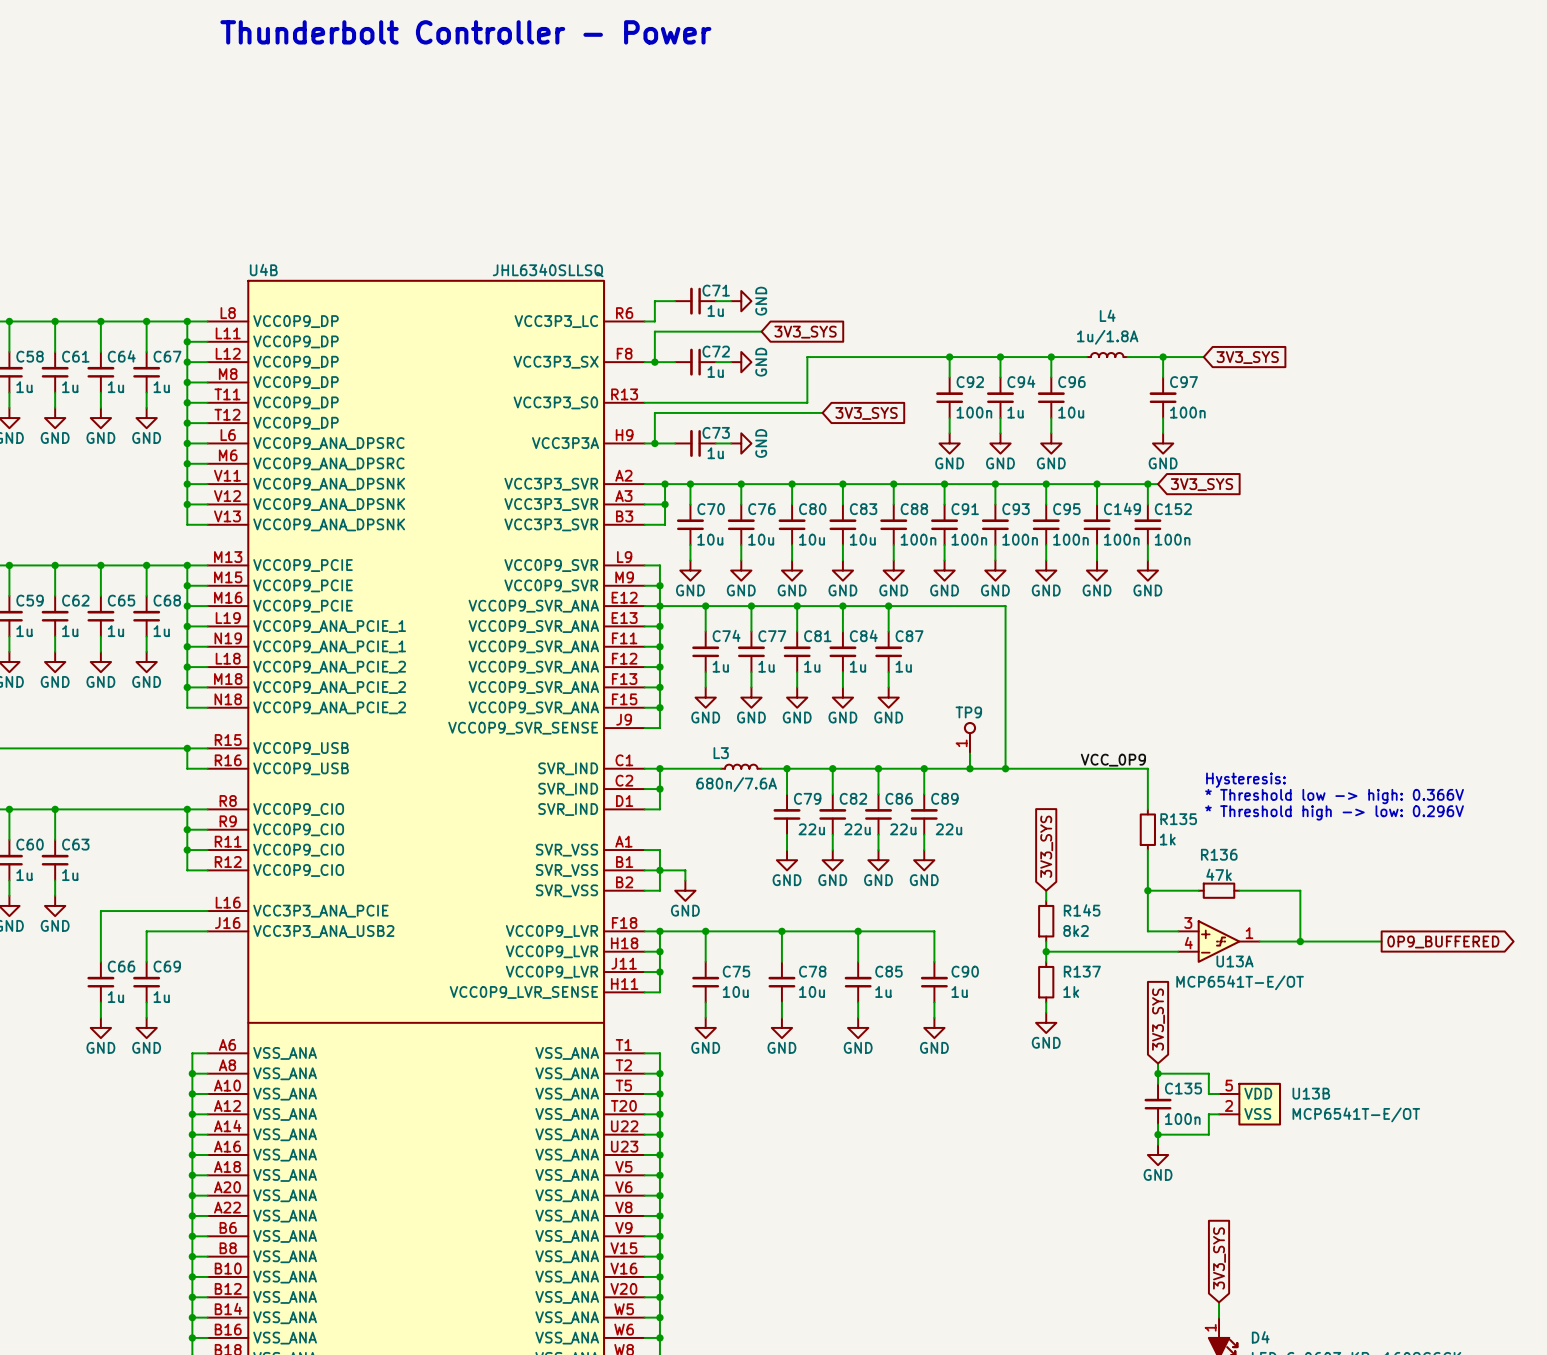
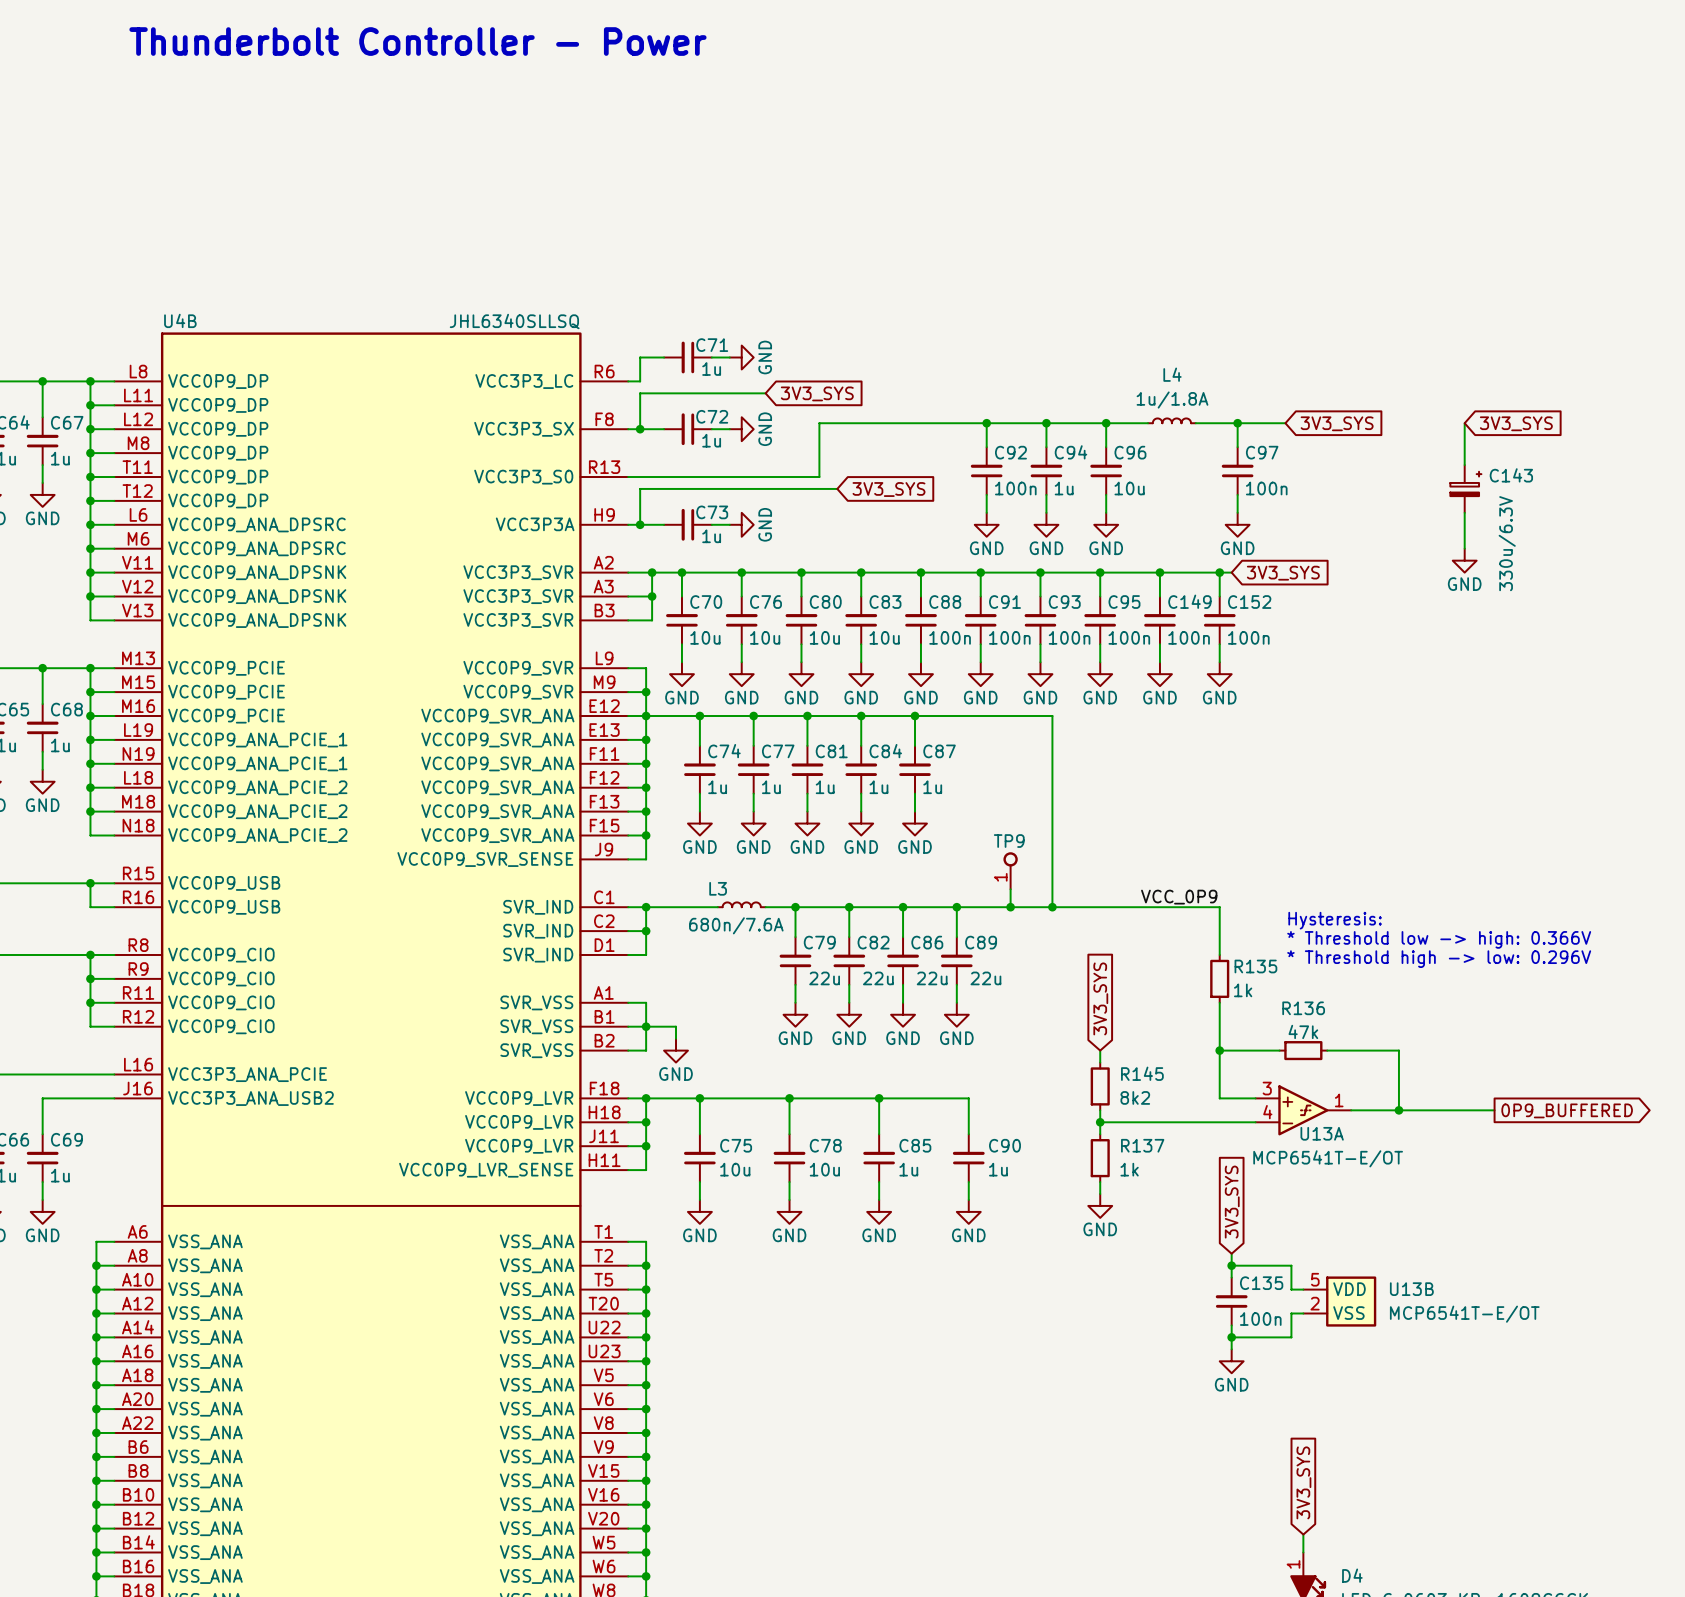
wire: none -> (1464, 423) (1464, 465)
global label: none -> 3V3_SYS (1516, 423)
C143: none -> (1465, 488)
wire: none -> (1464, 512) (1464, 548)
power symbol: none -> GND (1464, 560)

